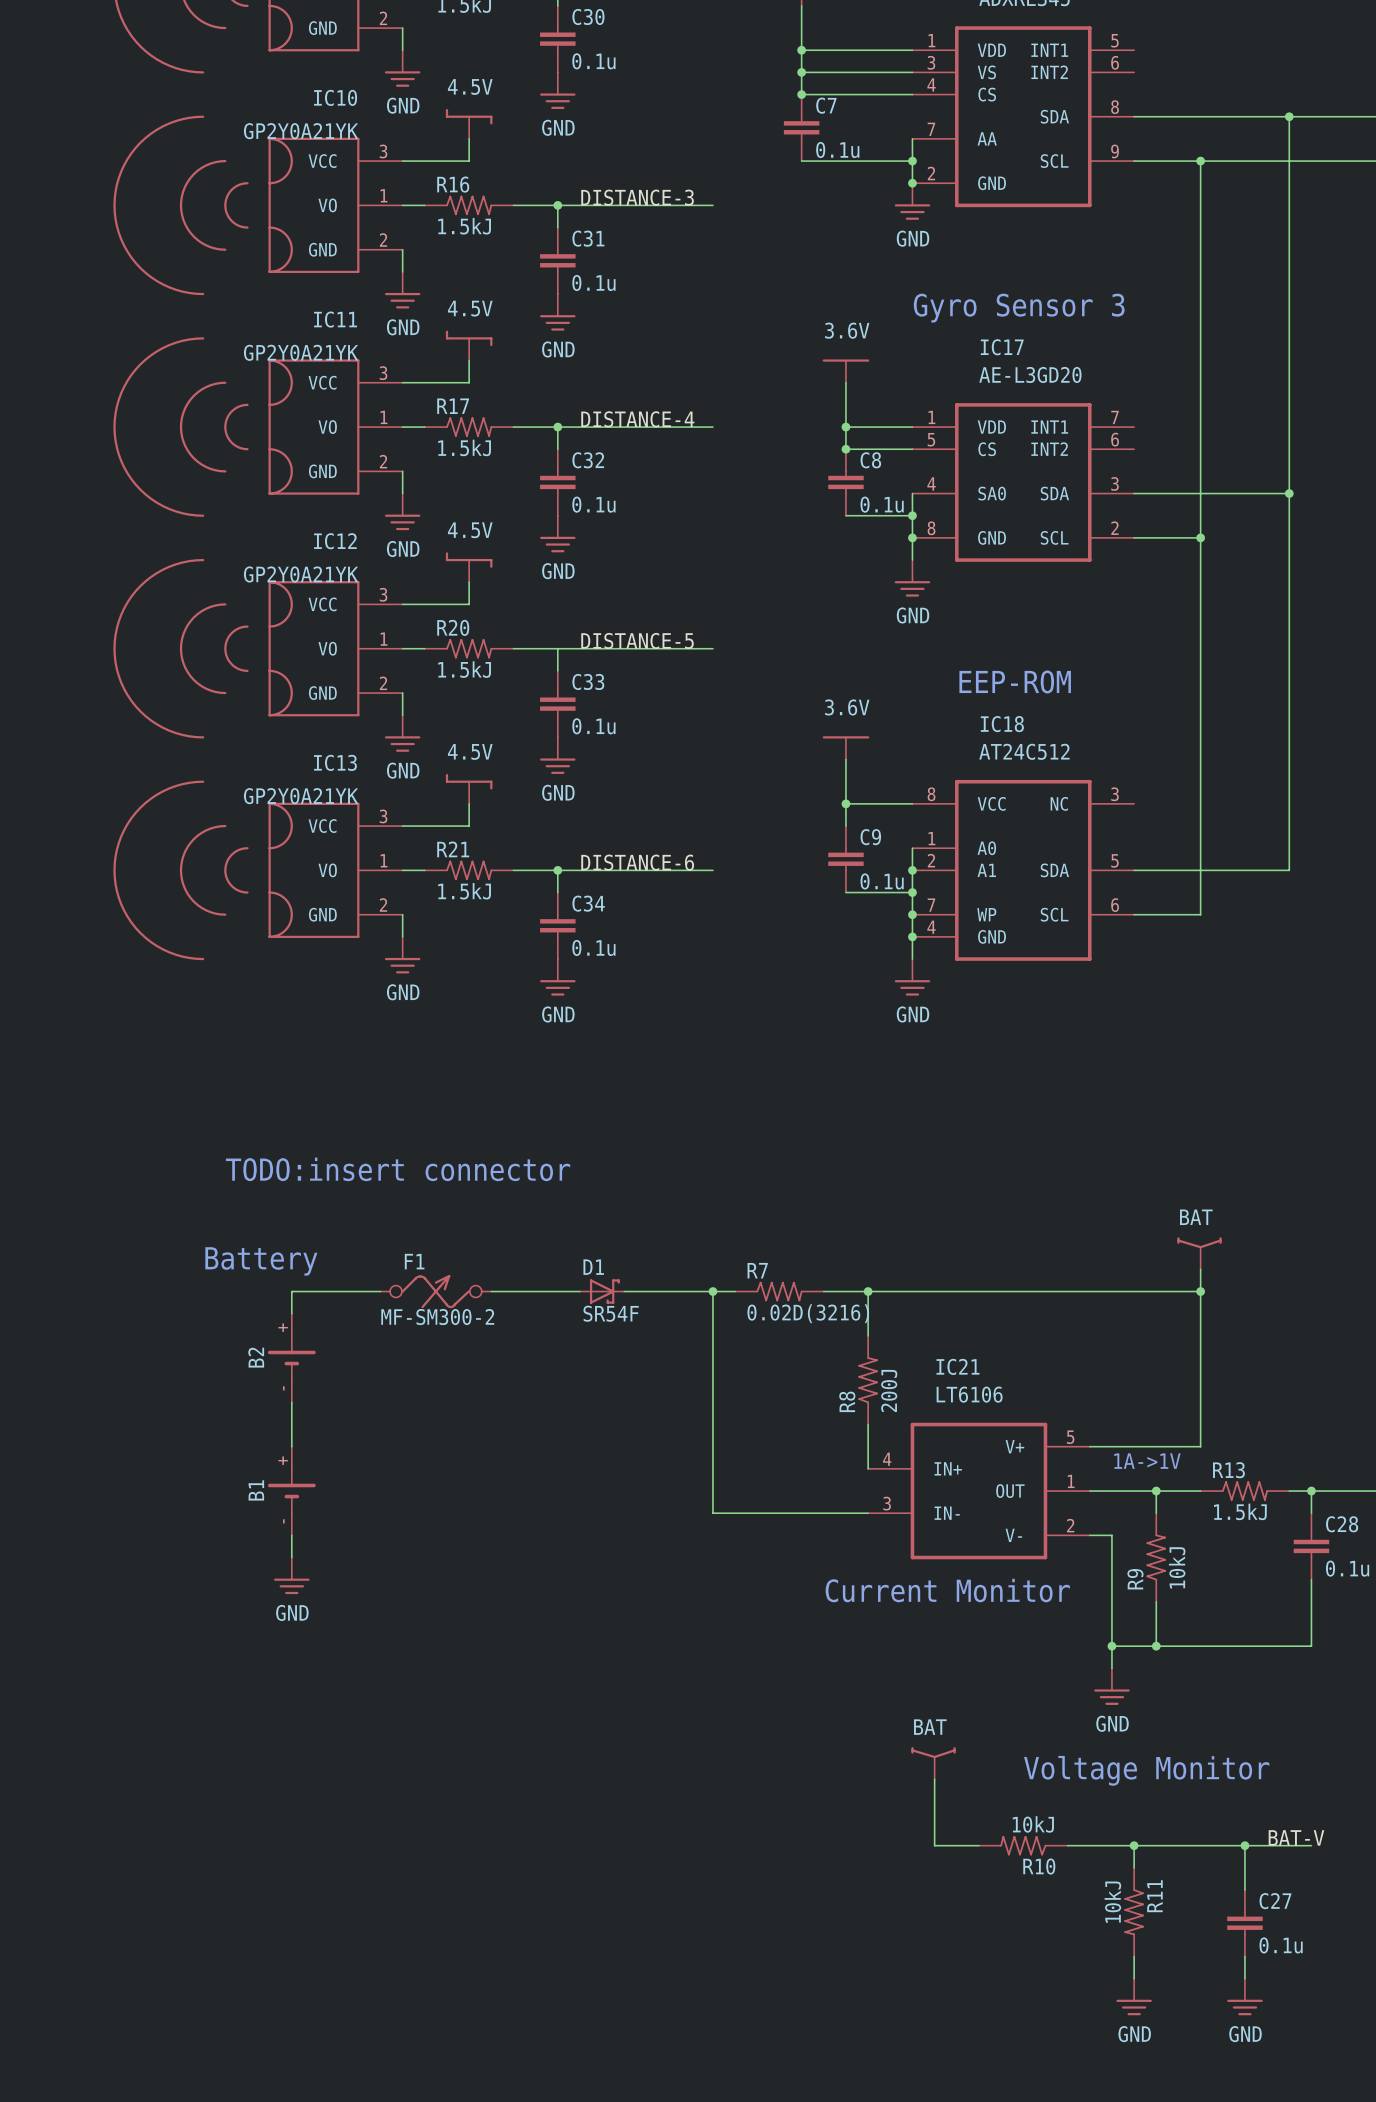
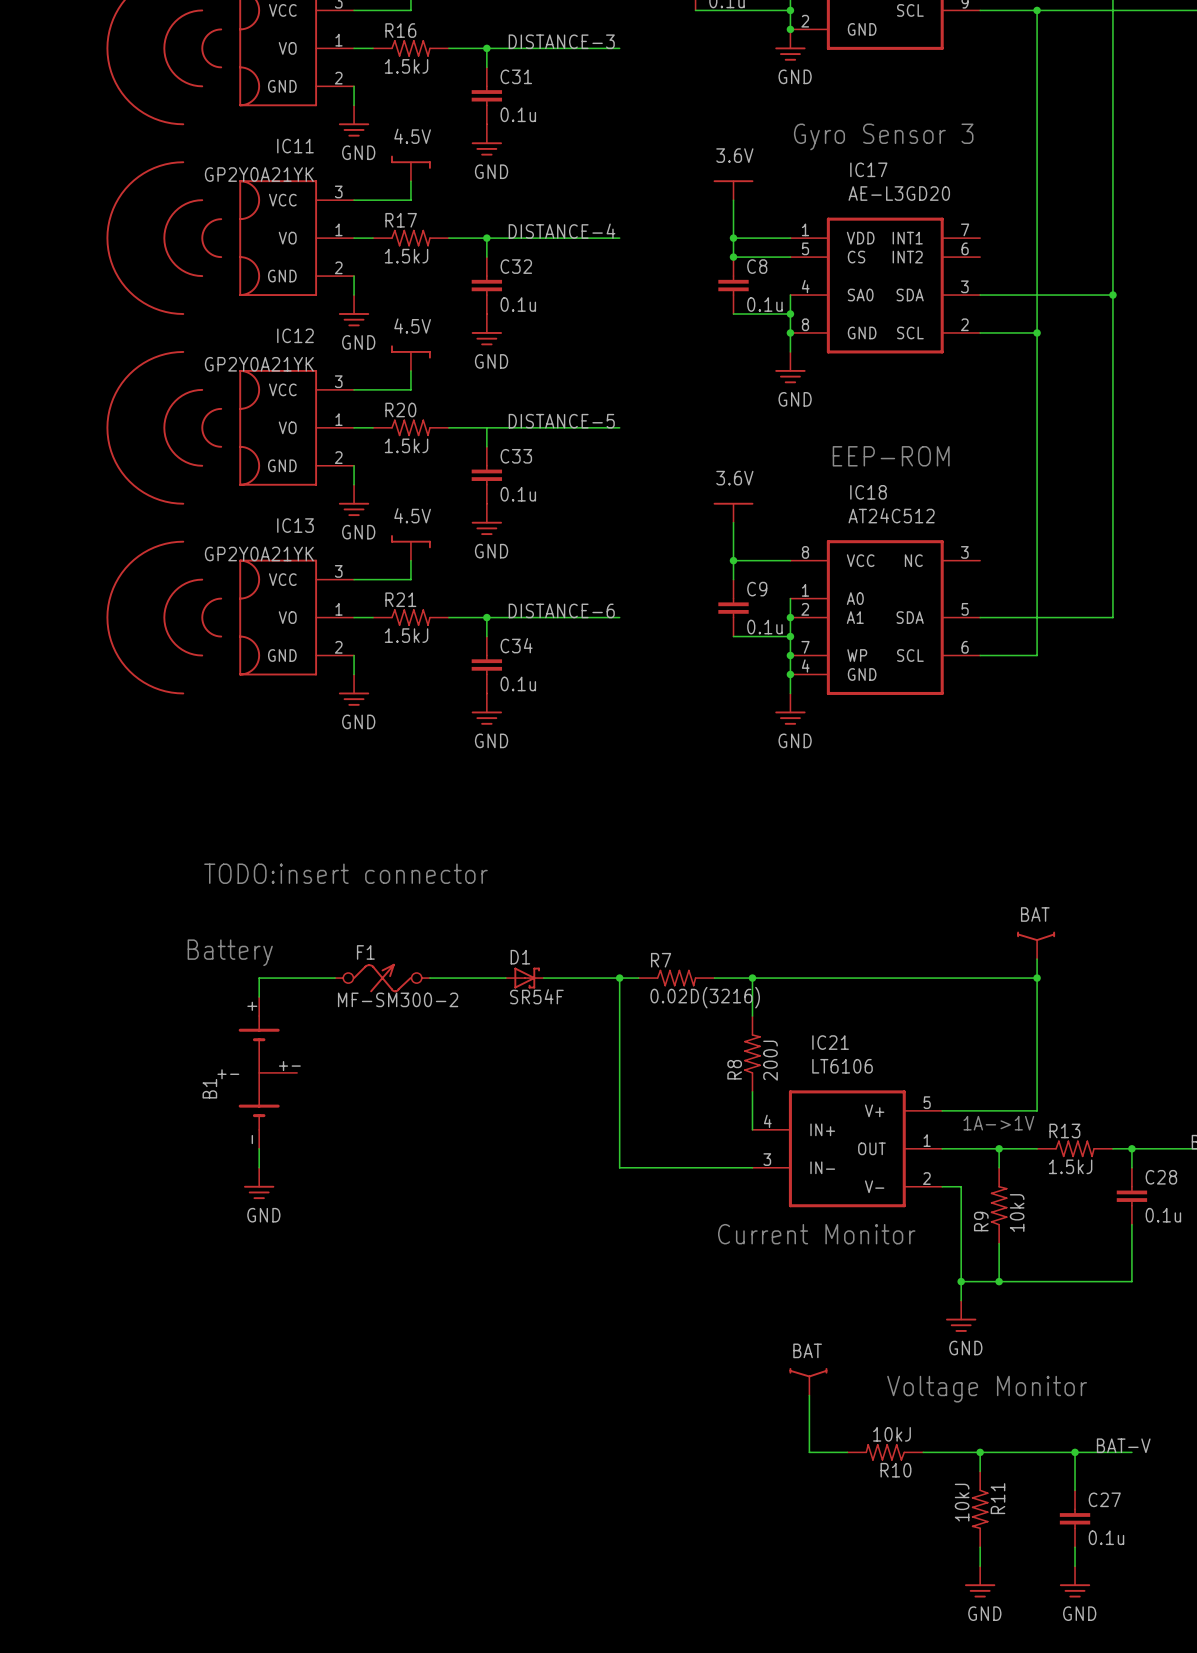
B2: (291, 1358) -> none
B1 symbol: [267, 1446, 316, 1536] -> [238, 997, 298, 1149]
B1 name position: B1 (256, 1490) -> B1 (209, 1088)
power symbol position: (291, 1575) -> (259, 1183)

